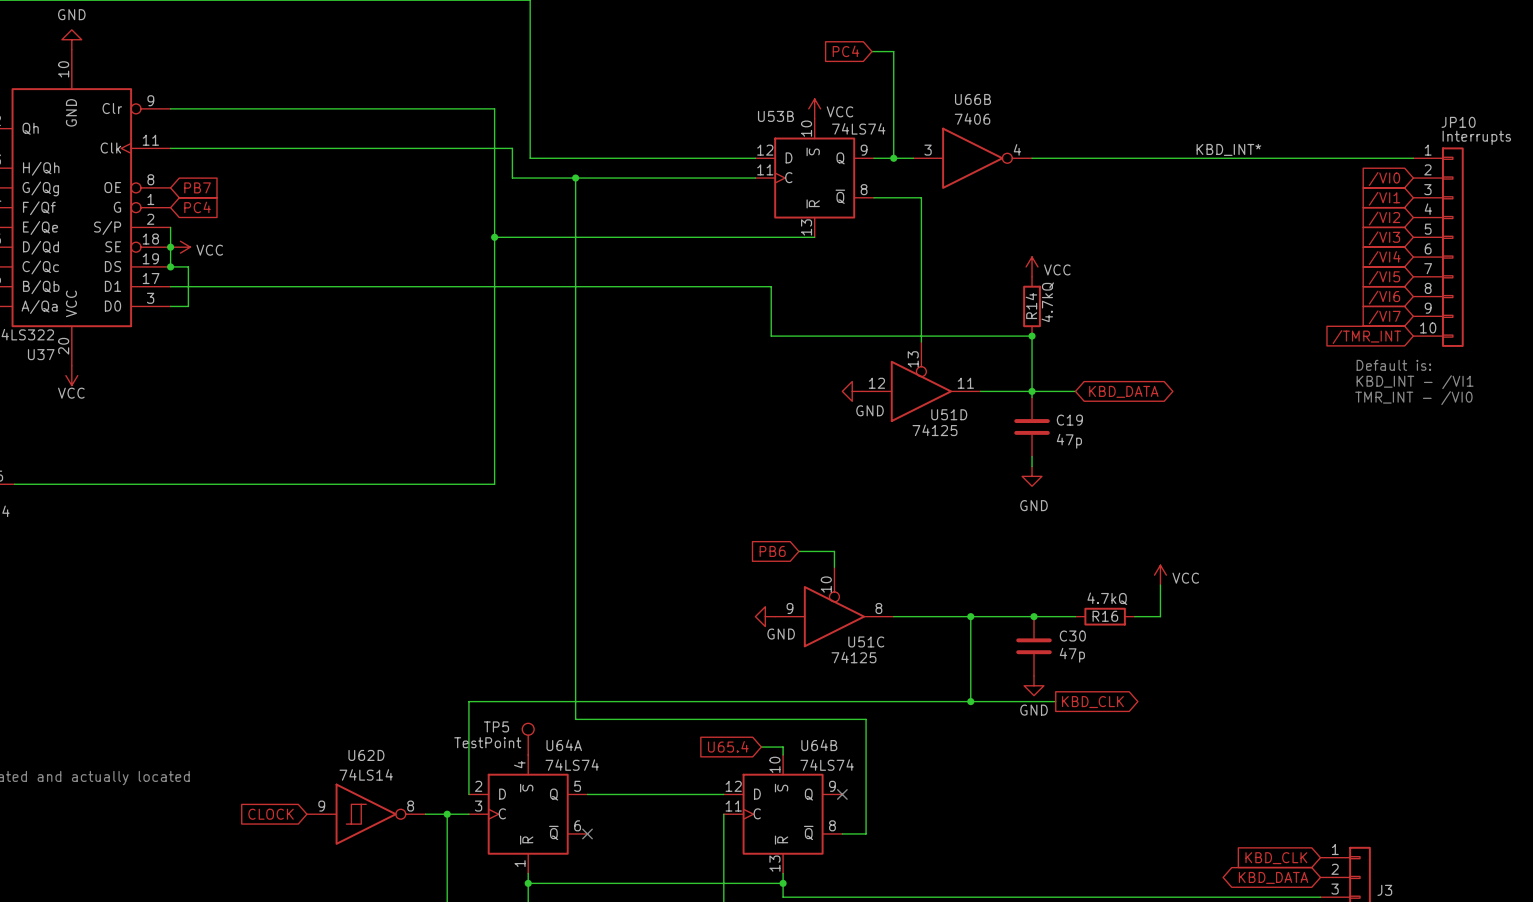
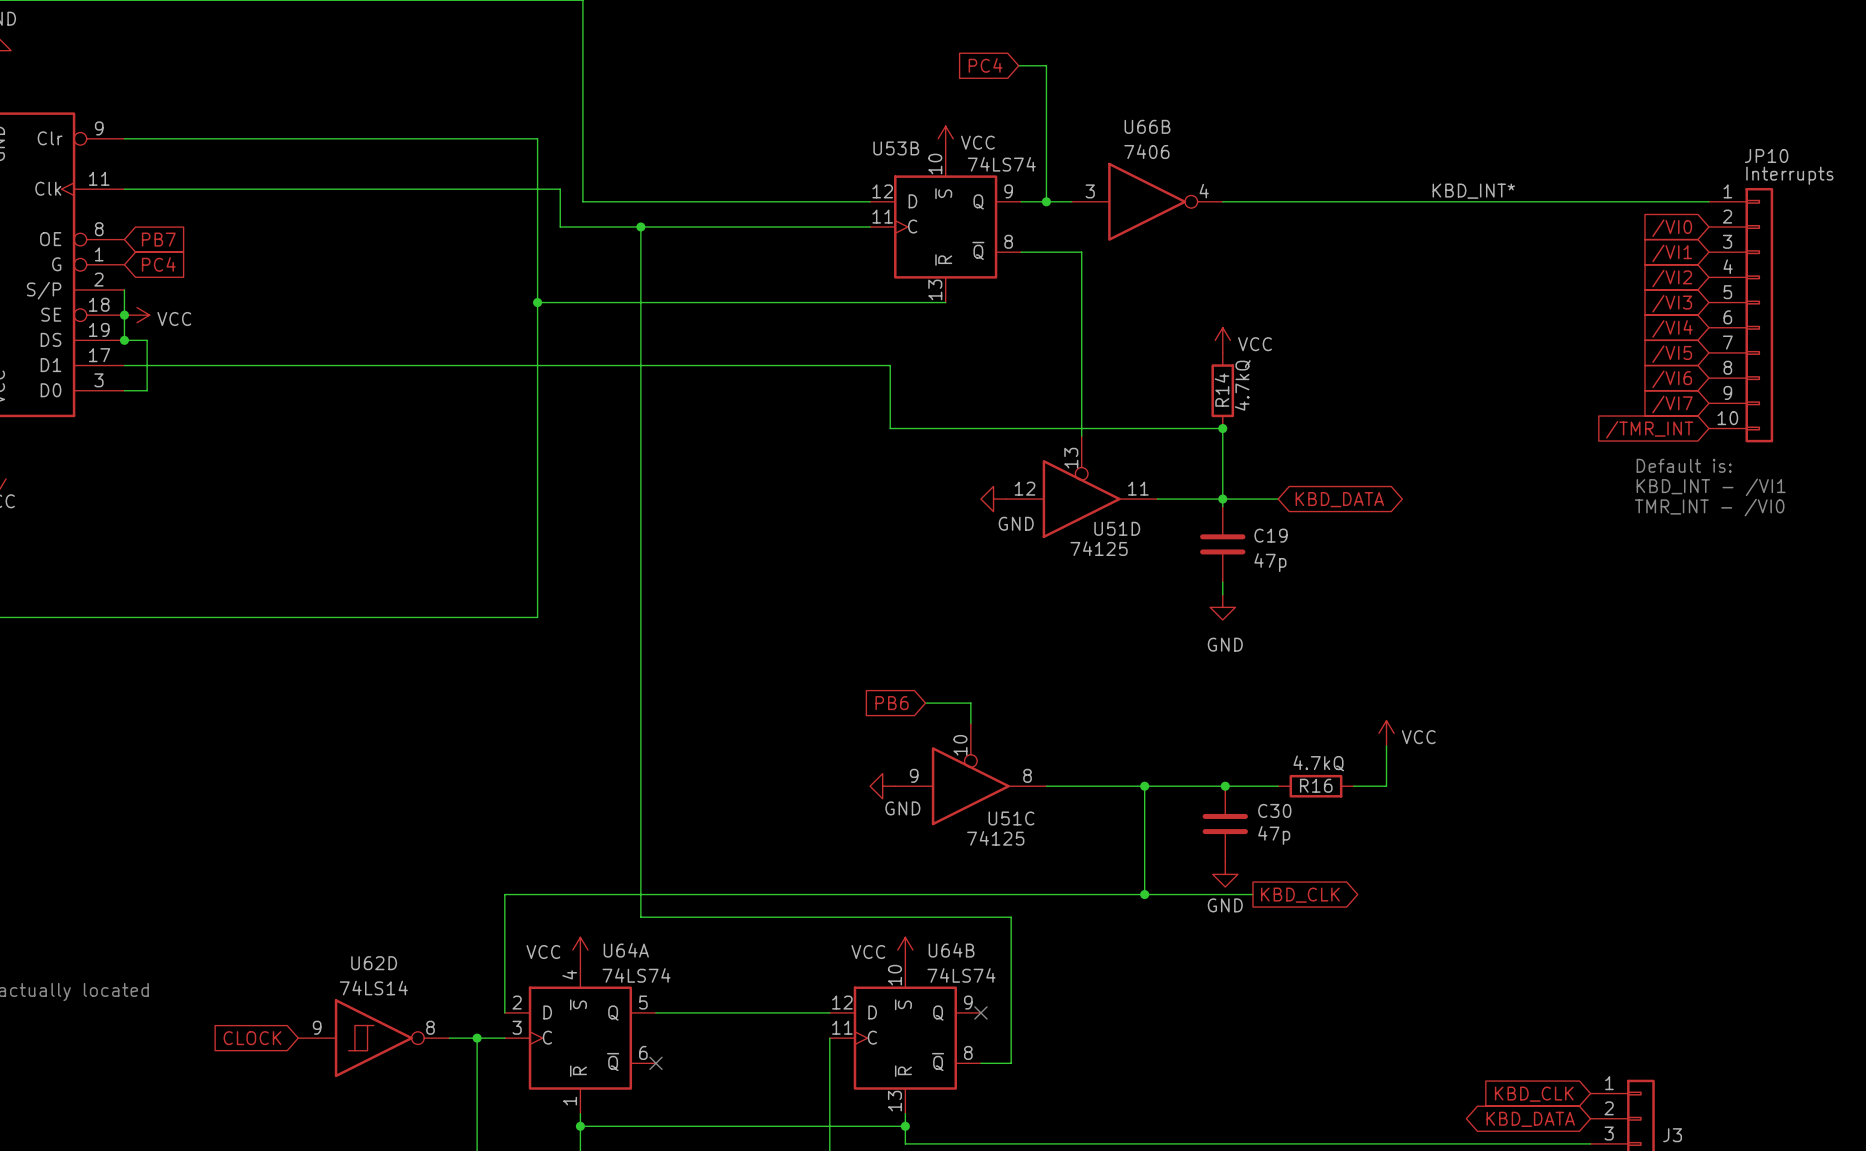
TP5: TestPoint (528, 739) -> none
power symbol: none -> VCC (580, 949)
power symbol: none -> VCC (905, 949)
global label: U65.4 (728, 746) -> none
wire: (761, 747) (783, 747) (783, 754) -> none

